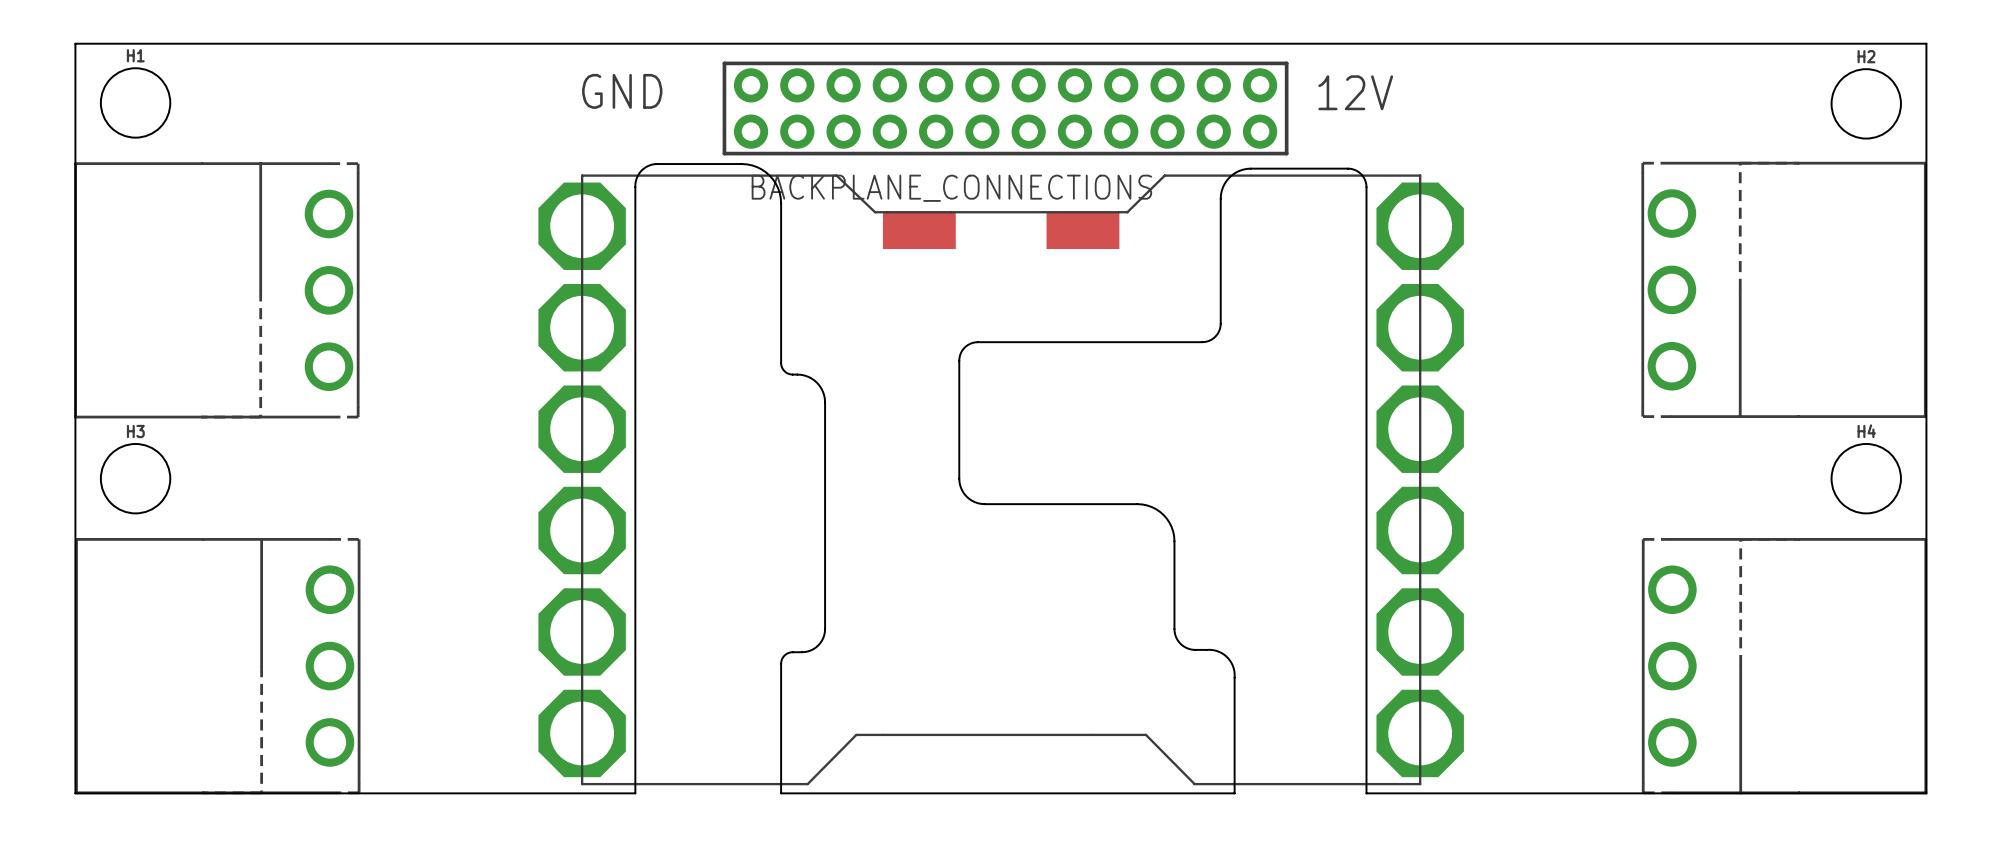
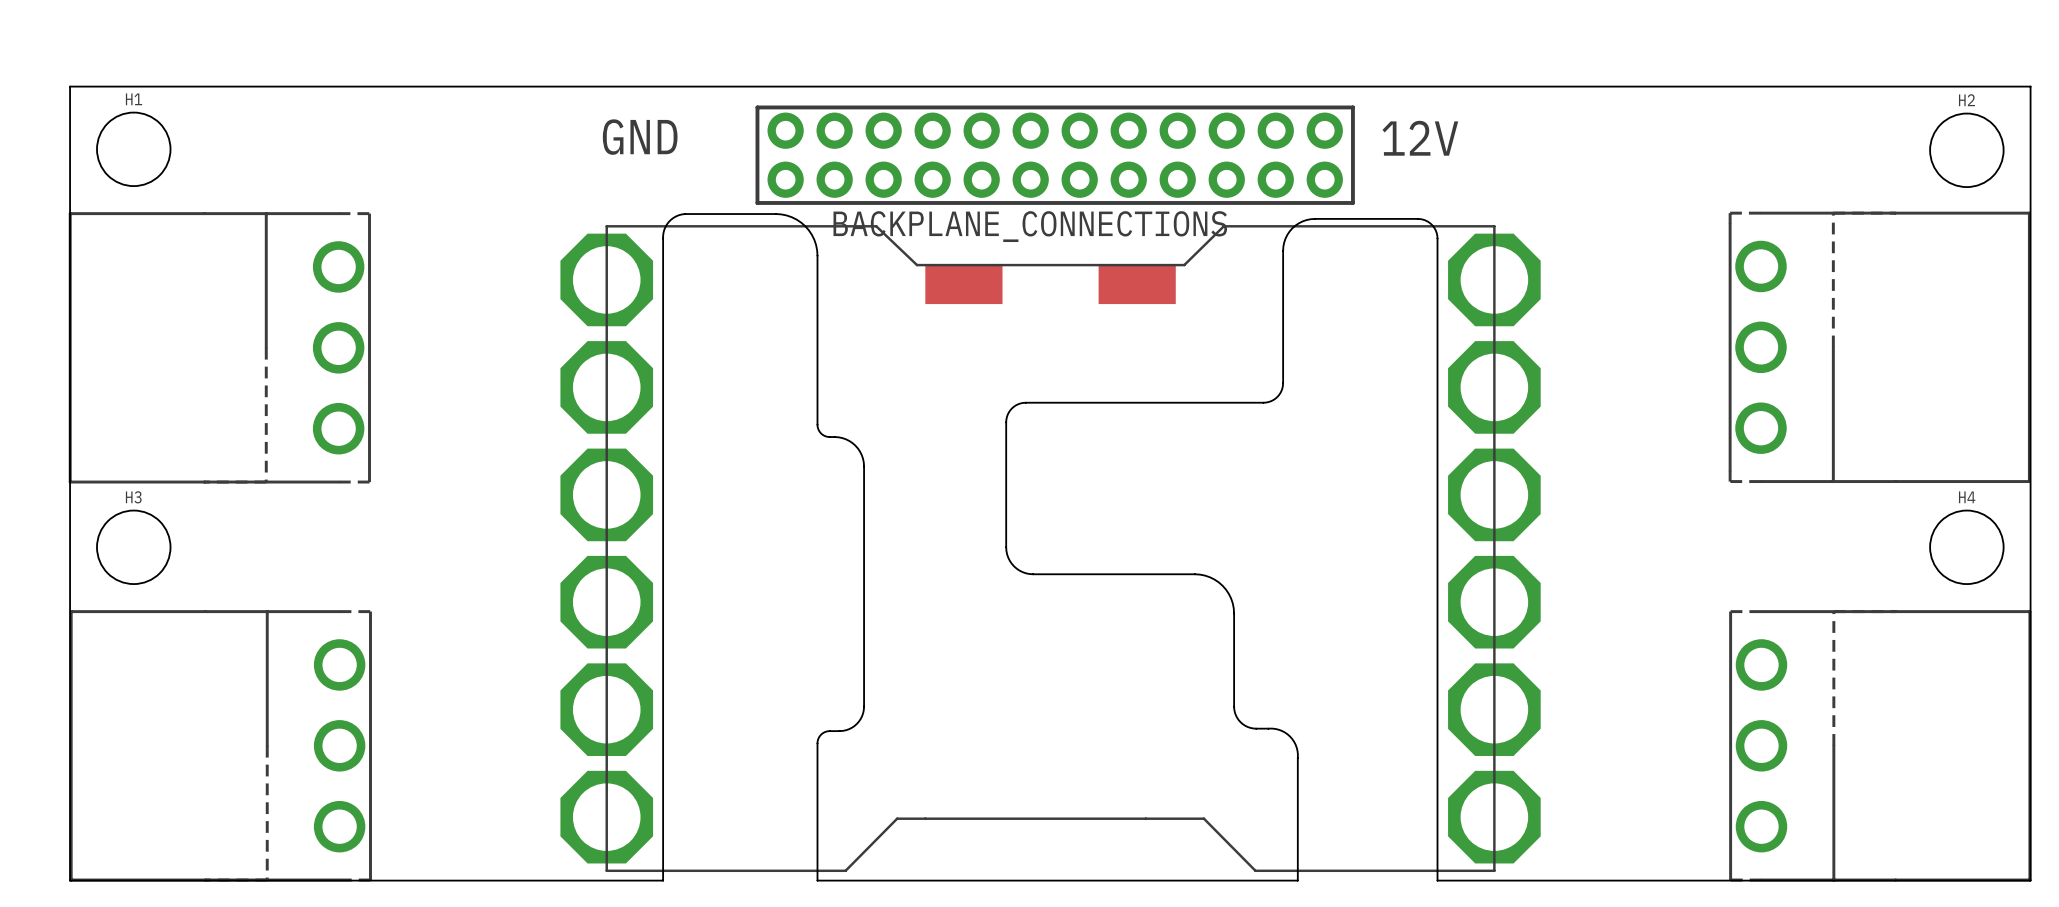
BACKPLANE_CONNECTIONS name position: BACKPLANE_CONNECTIONS (951, 188) -> BACKPLANE_CONNECTIONS (1030, 226)

